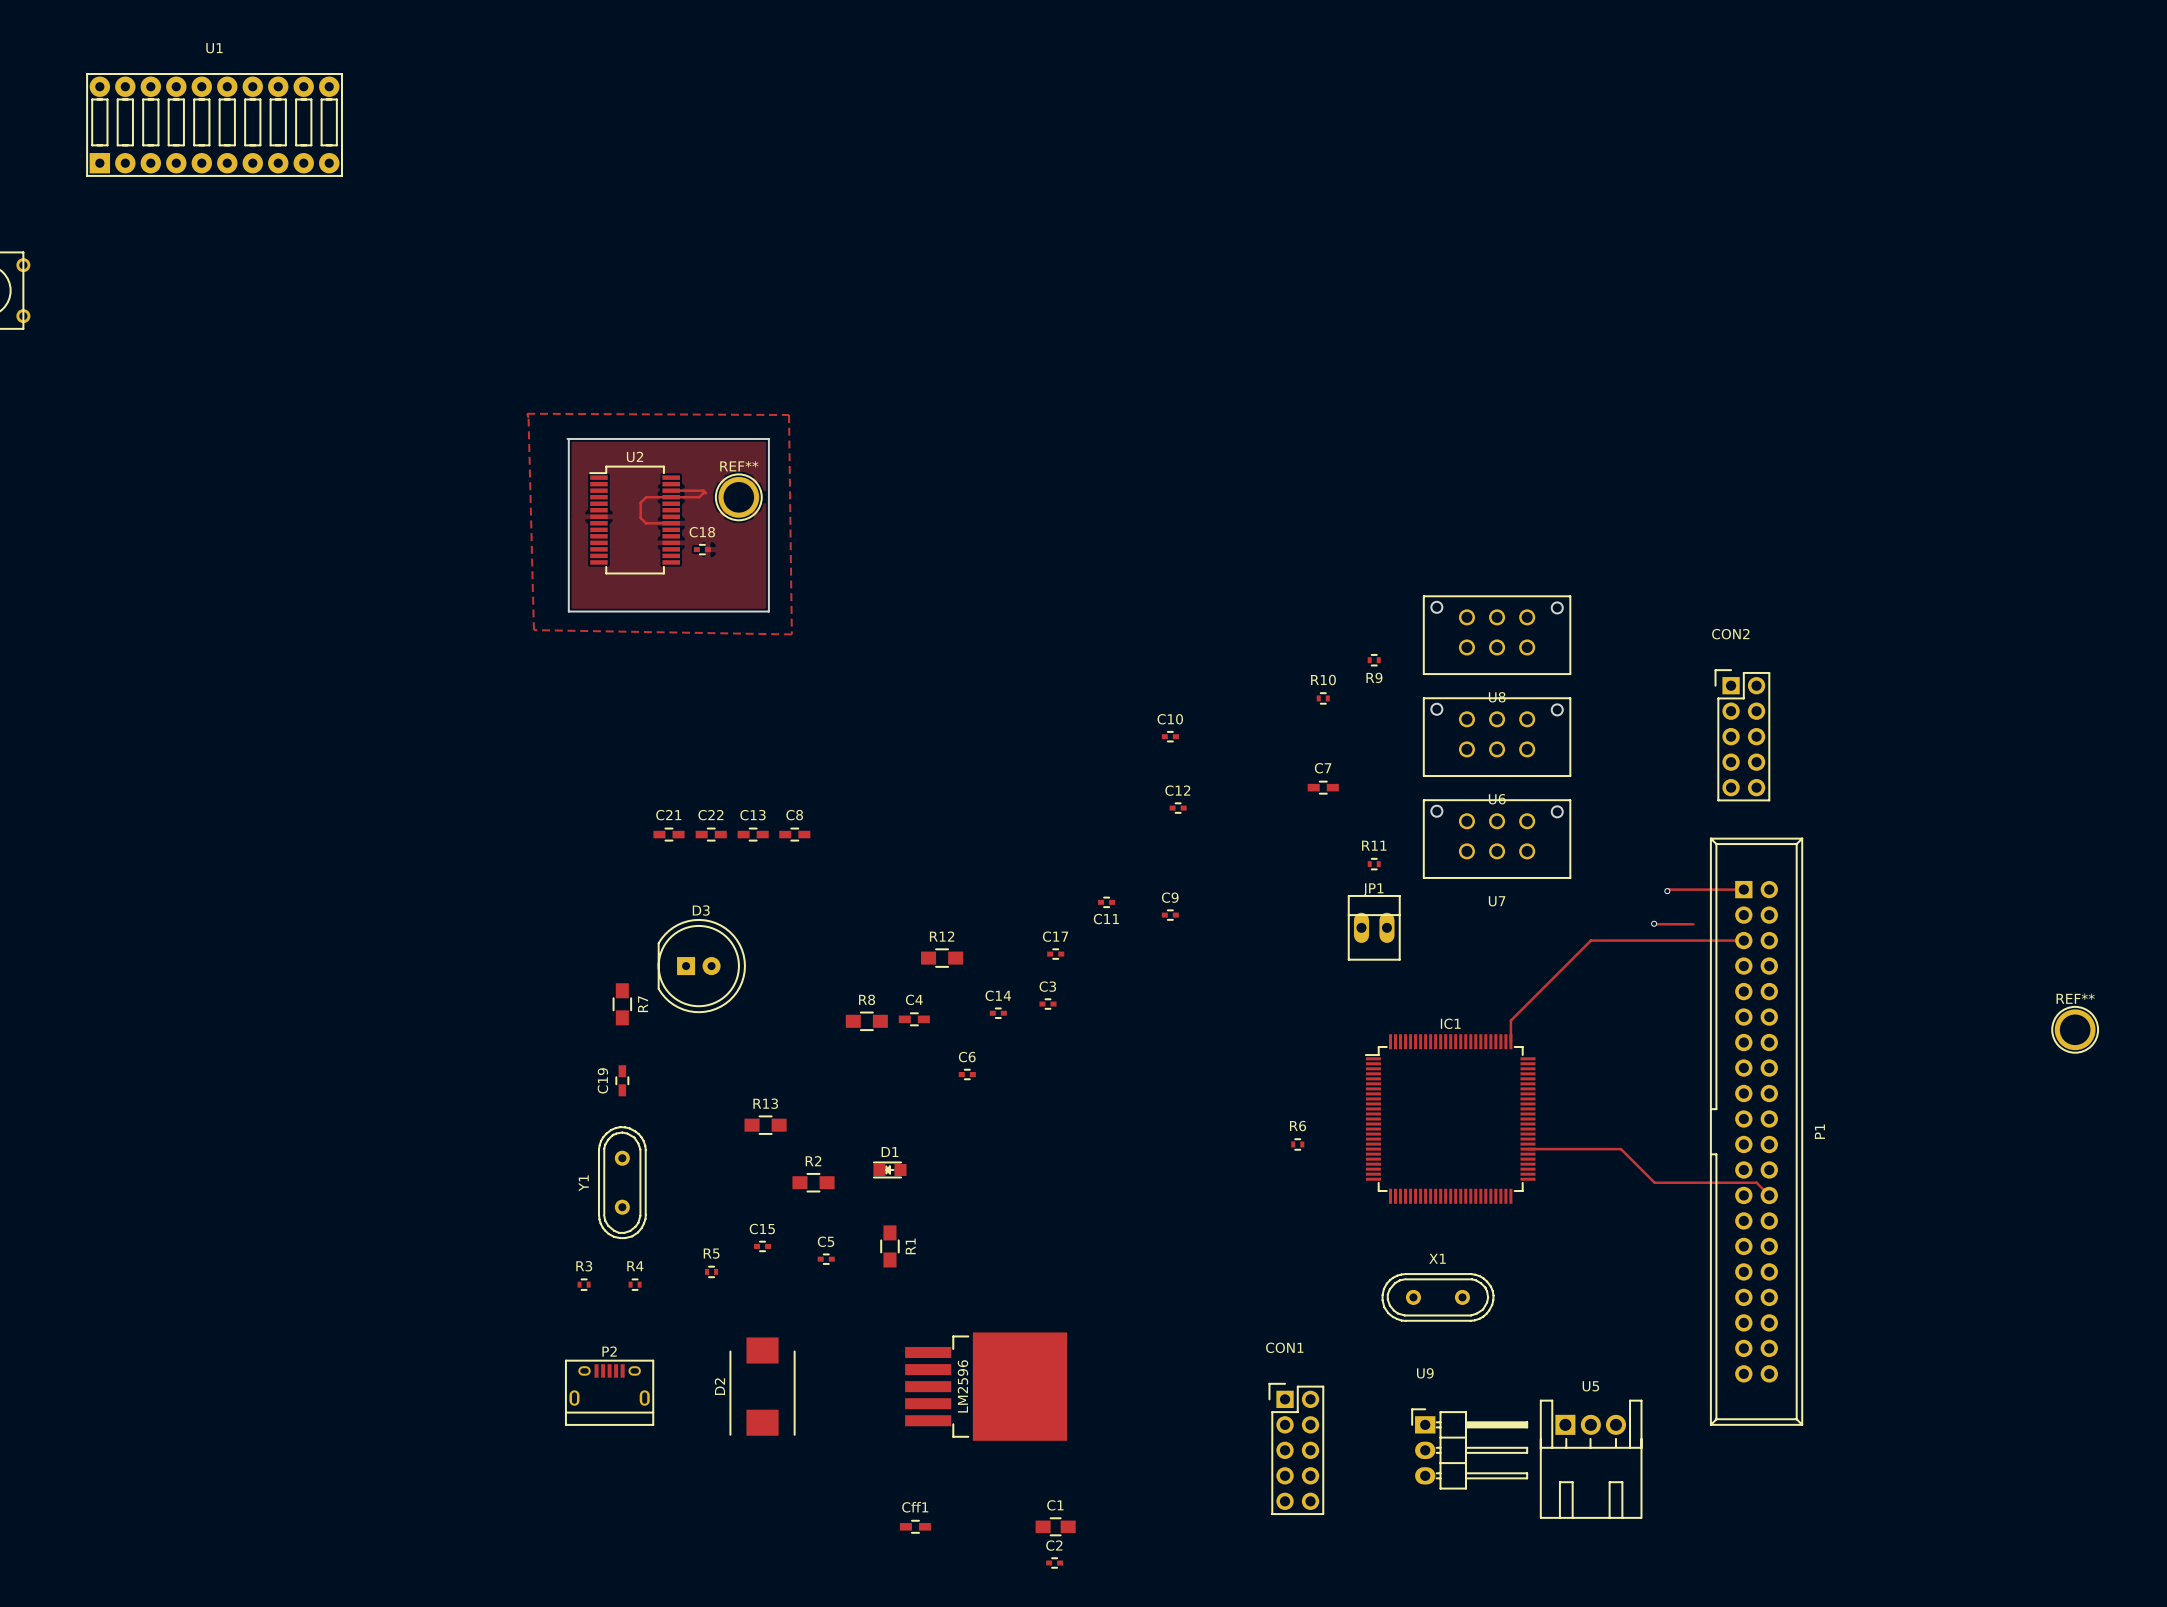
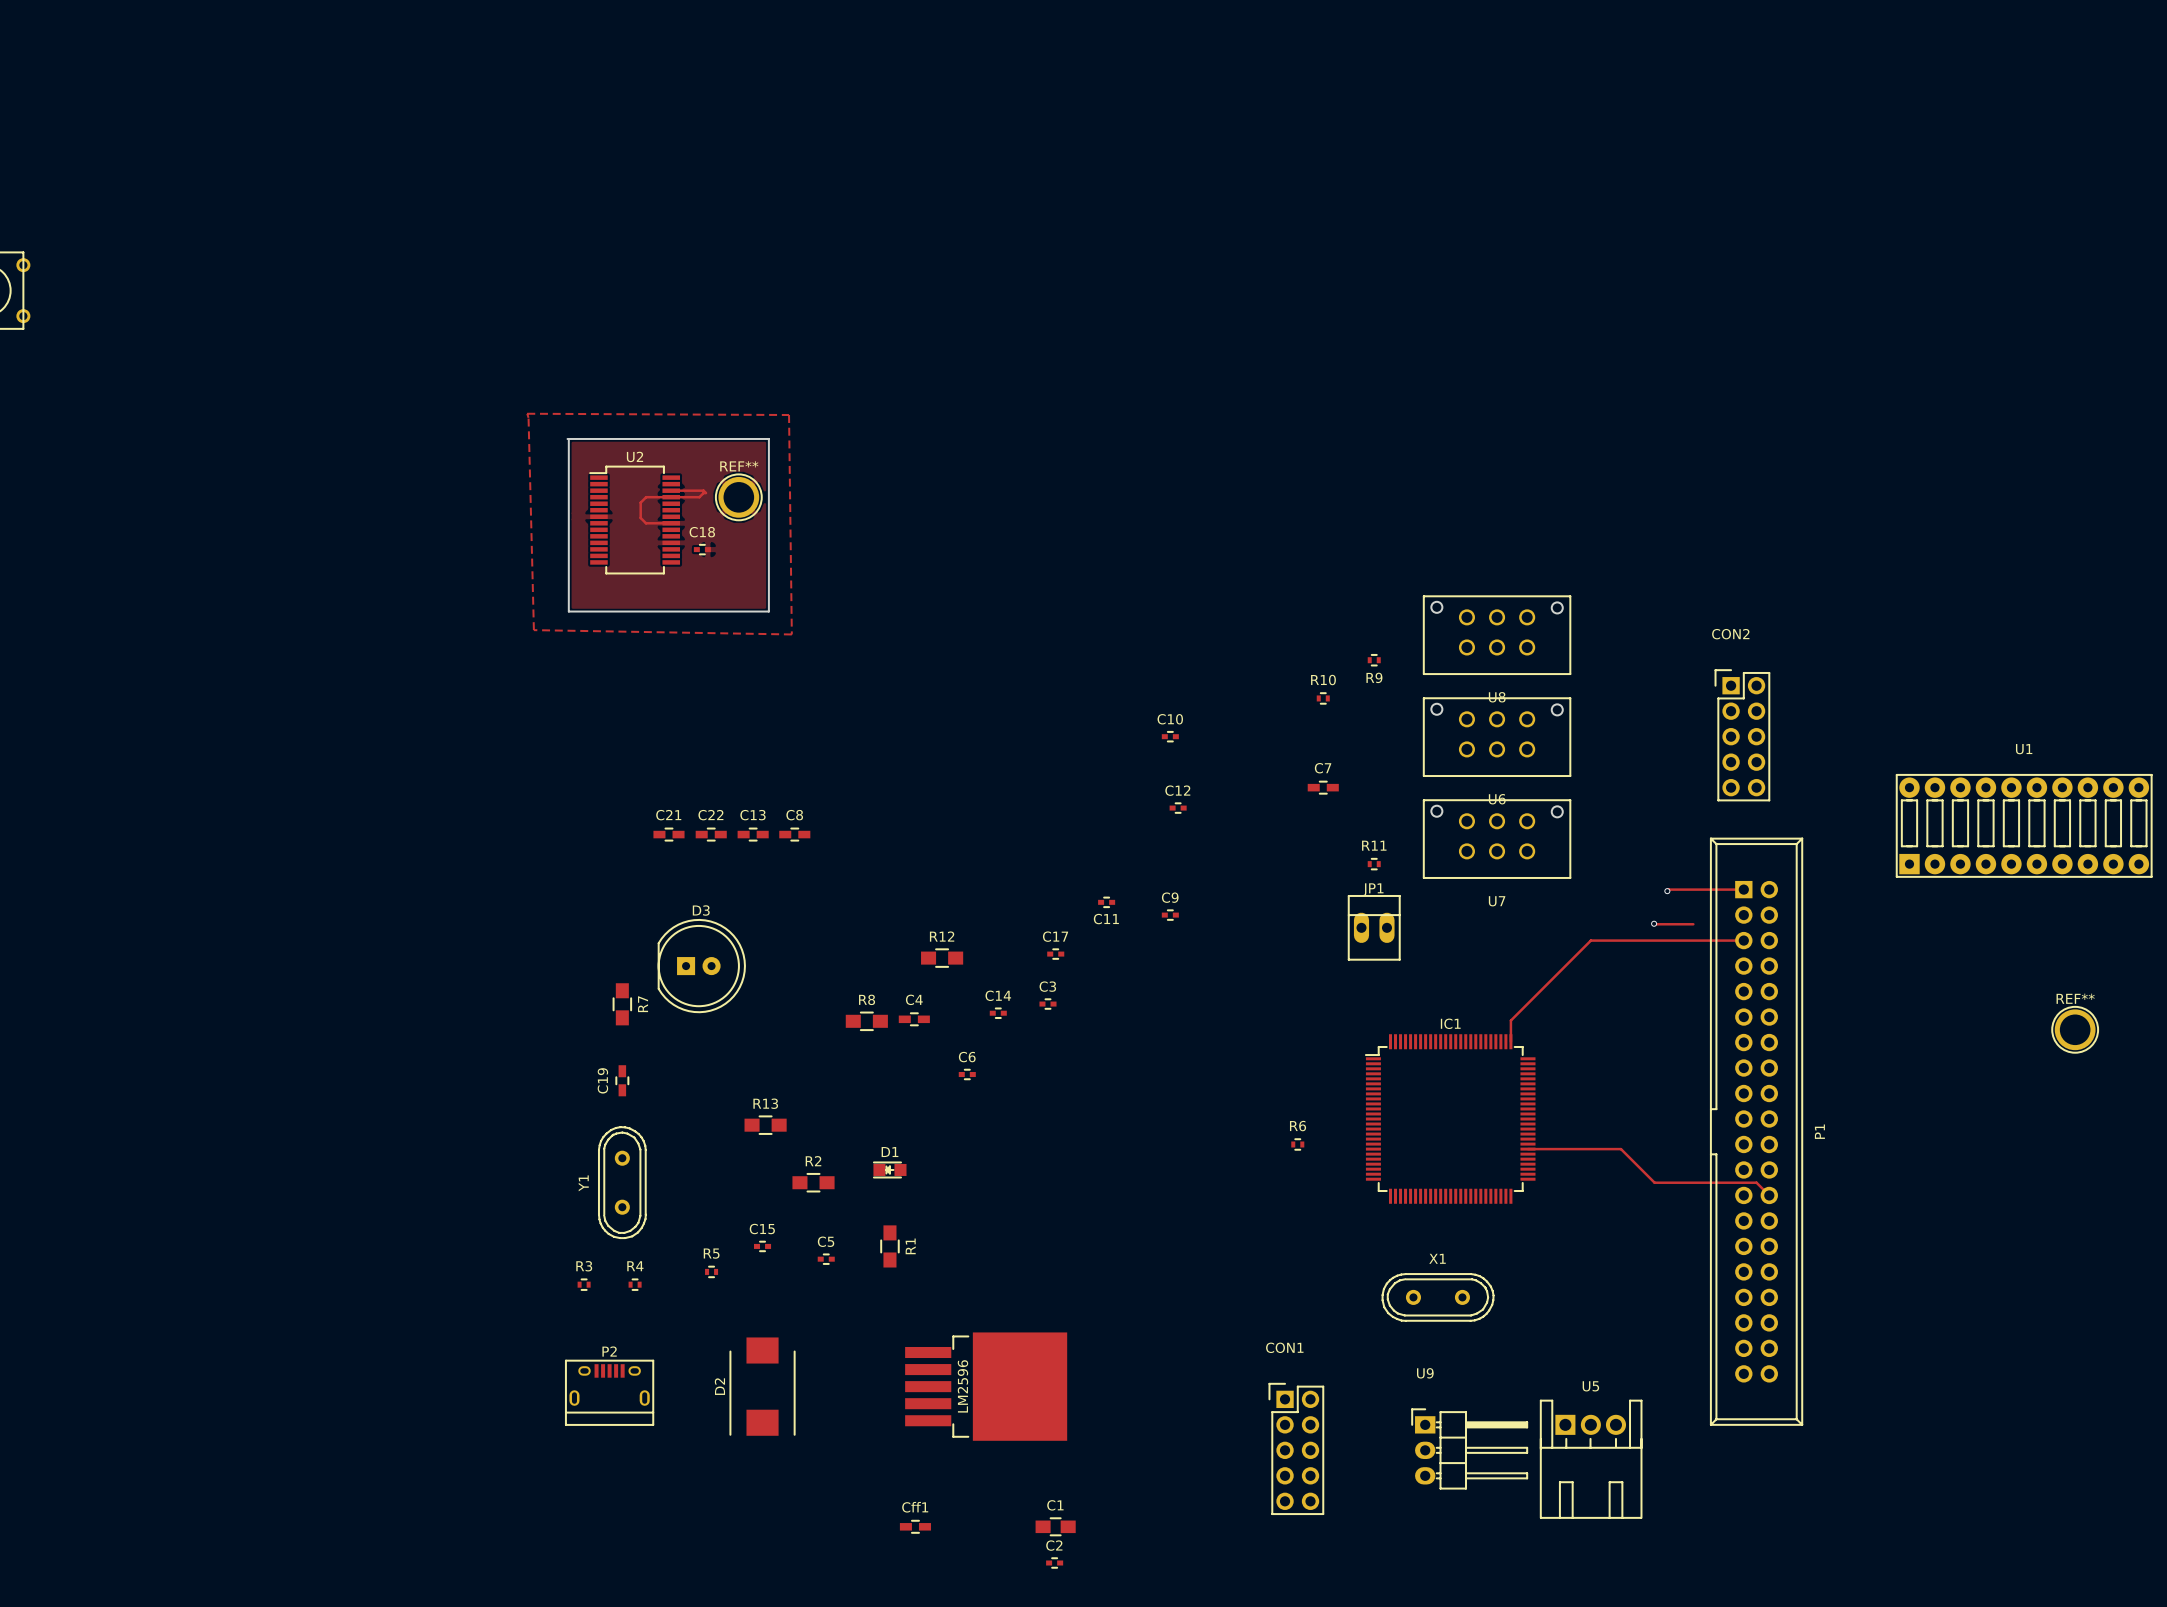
U1 position: (214, 124) -> (2024, 825)

